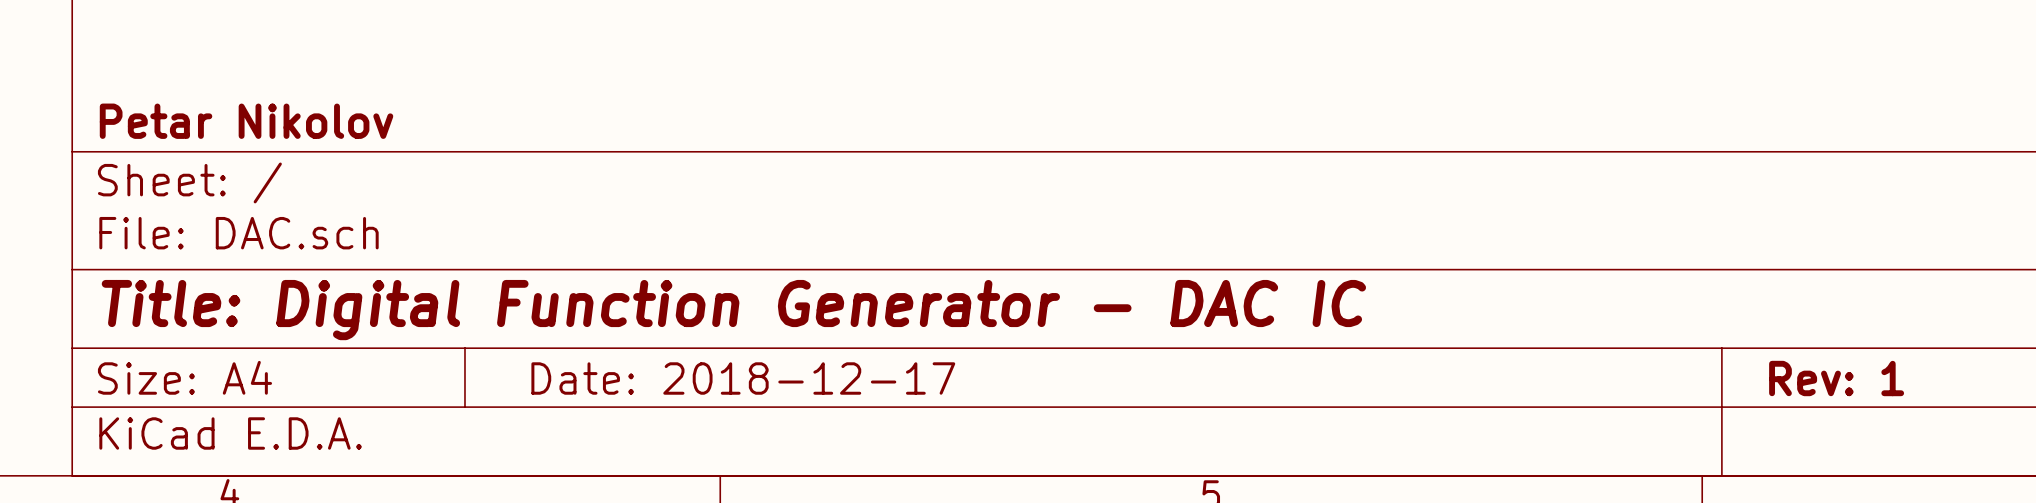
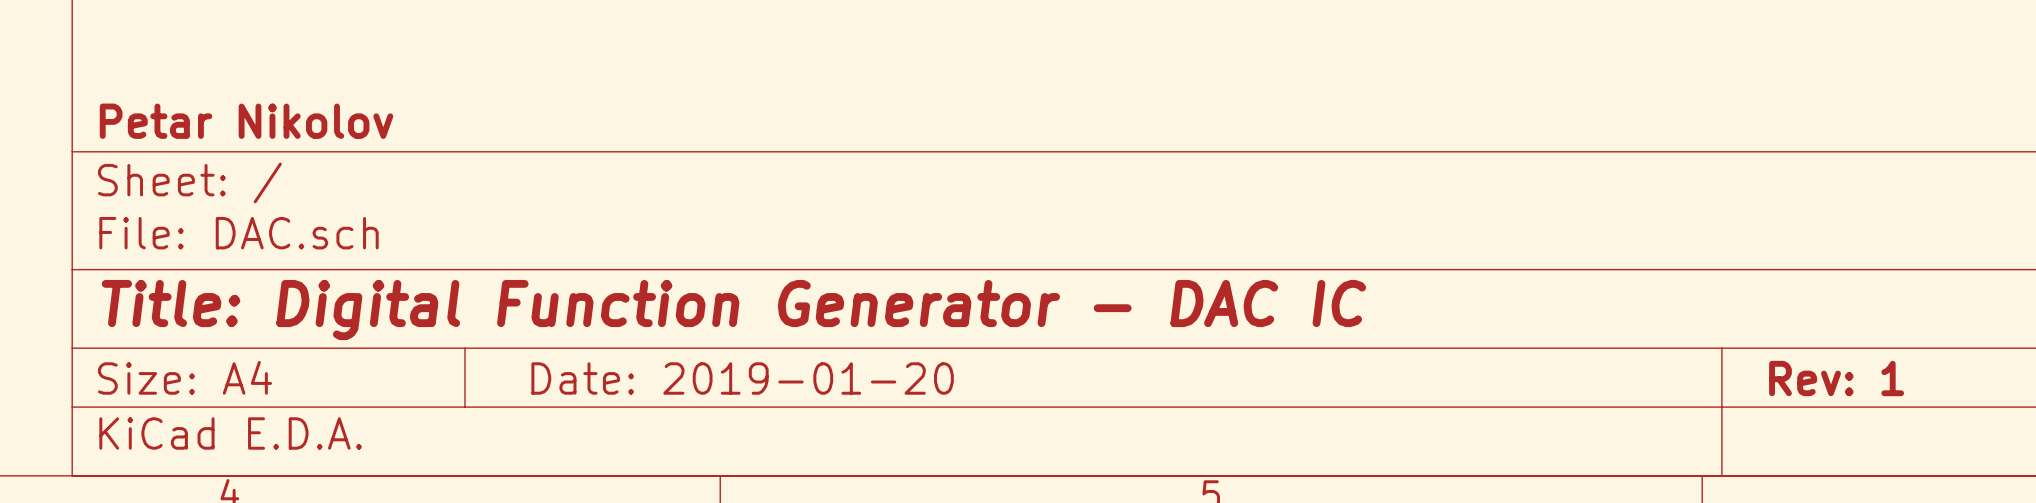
title block: Date: 2018-12-17 (743, 378) -> Date: 2019-01-20 (742, 378)

